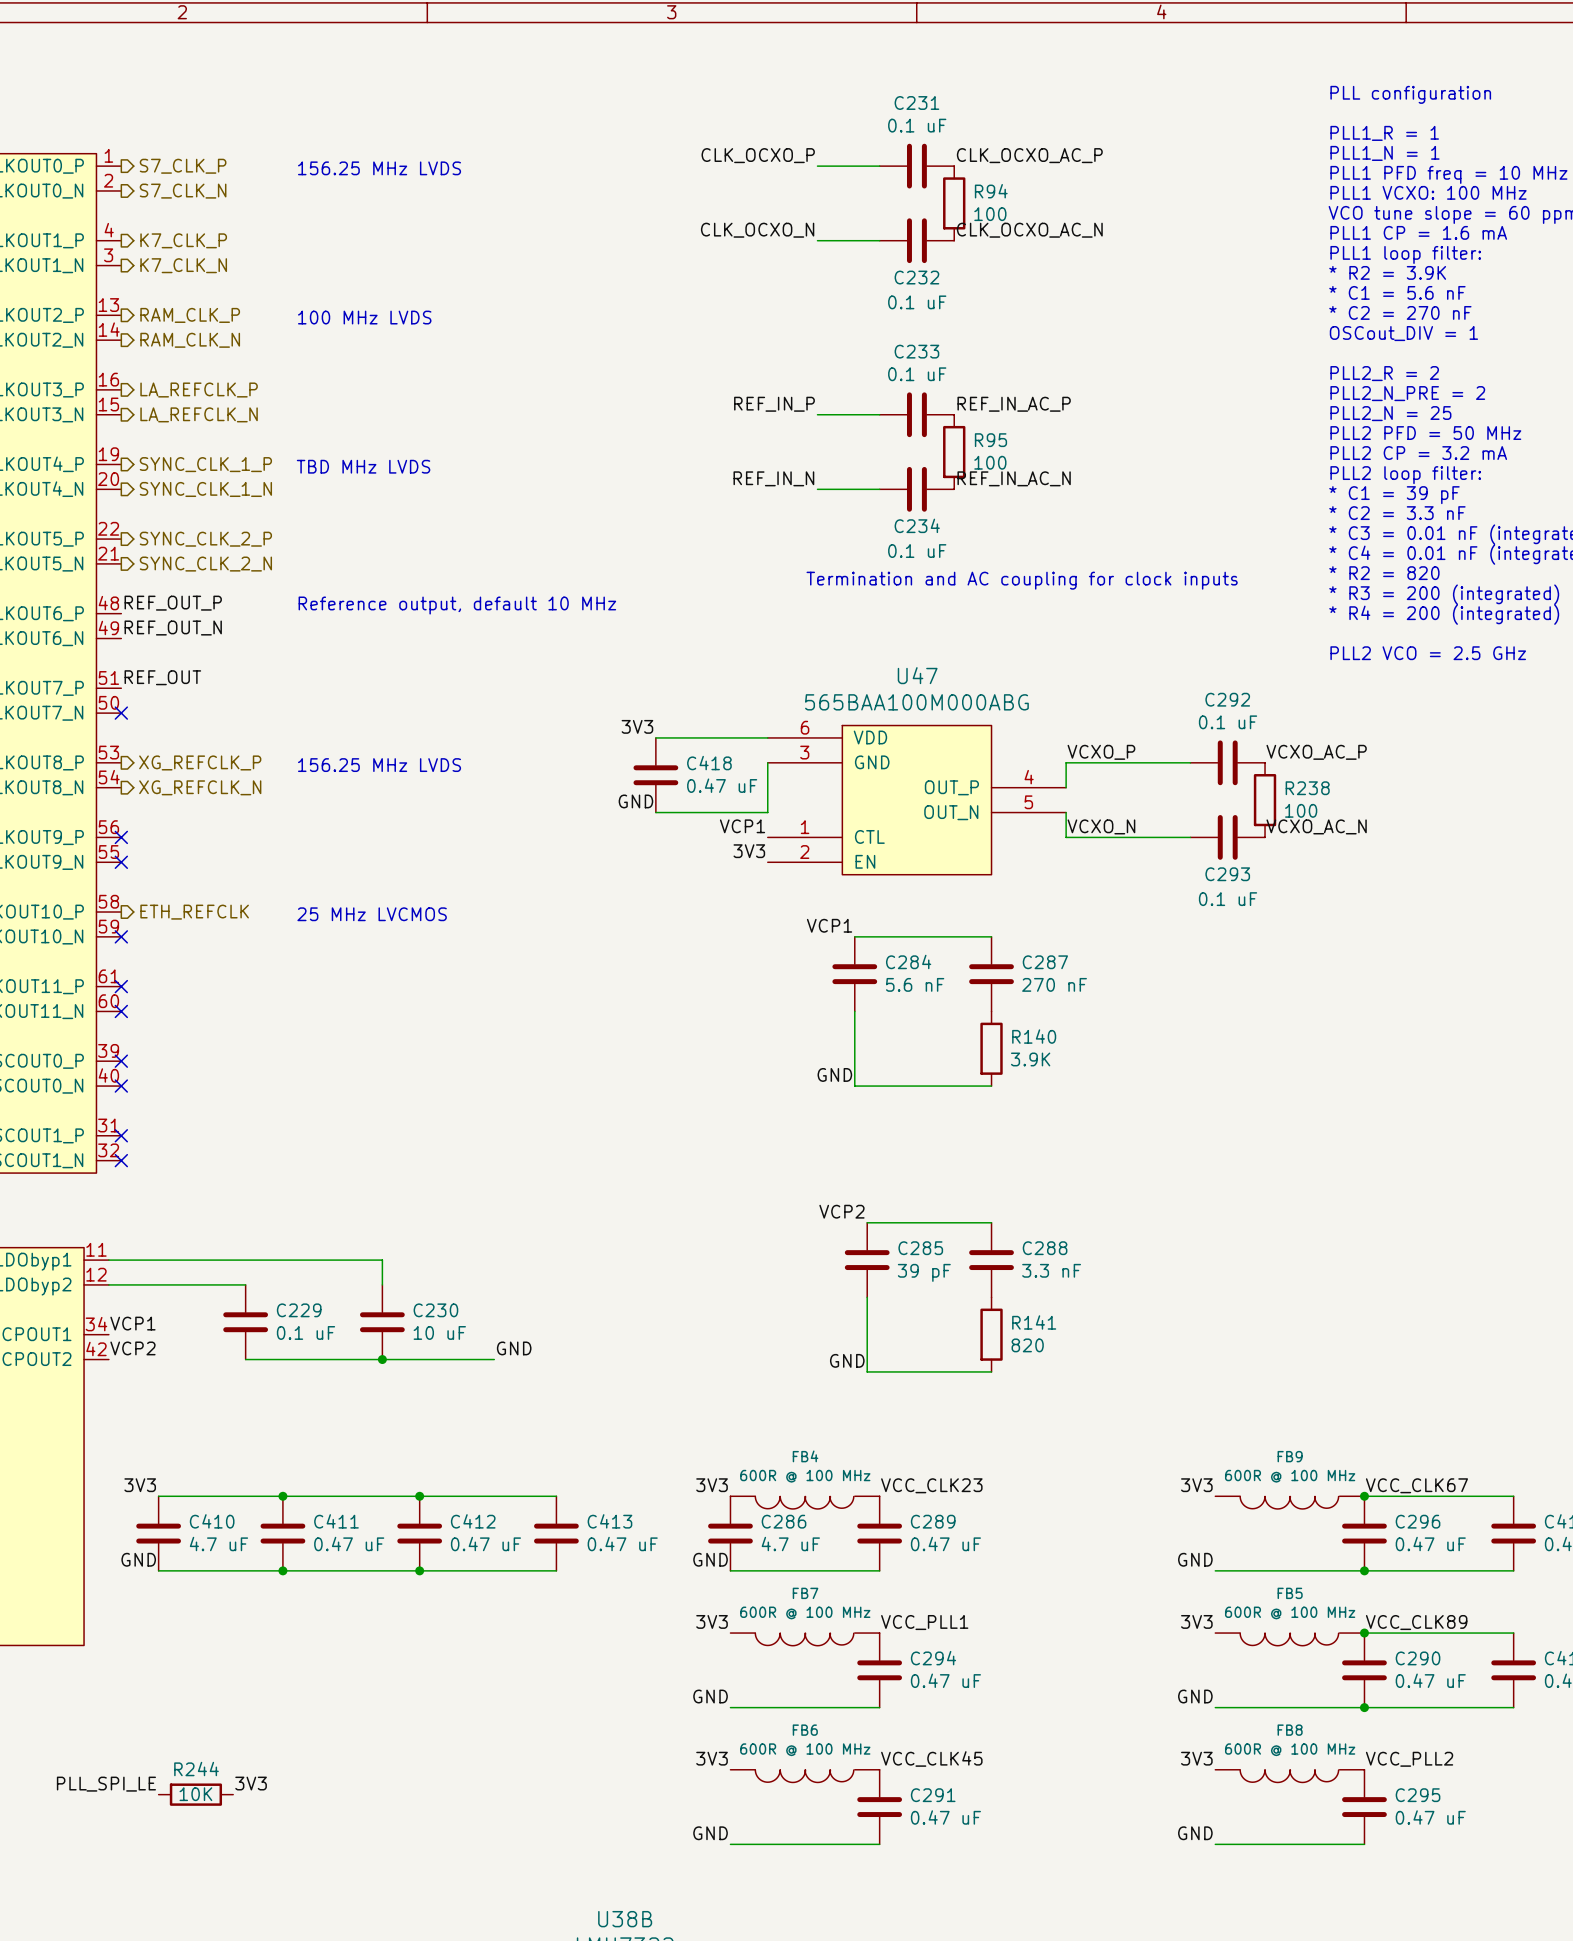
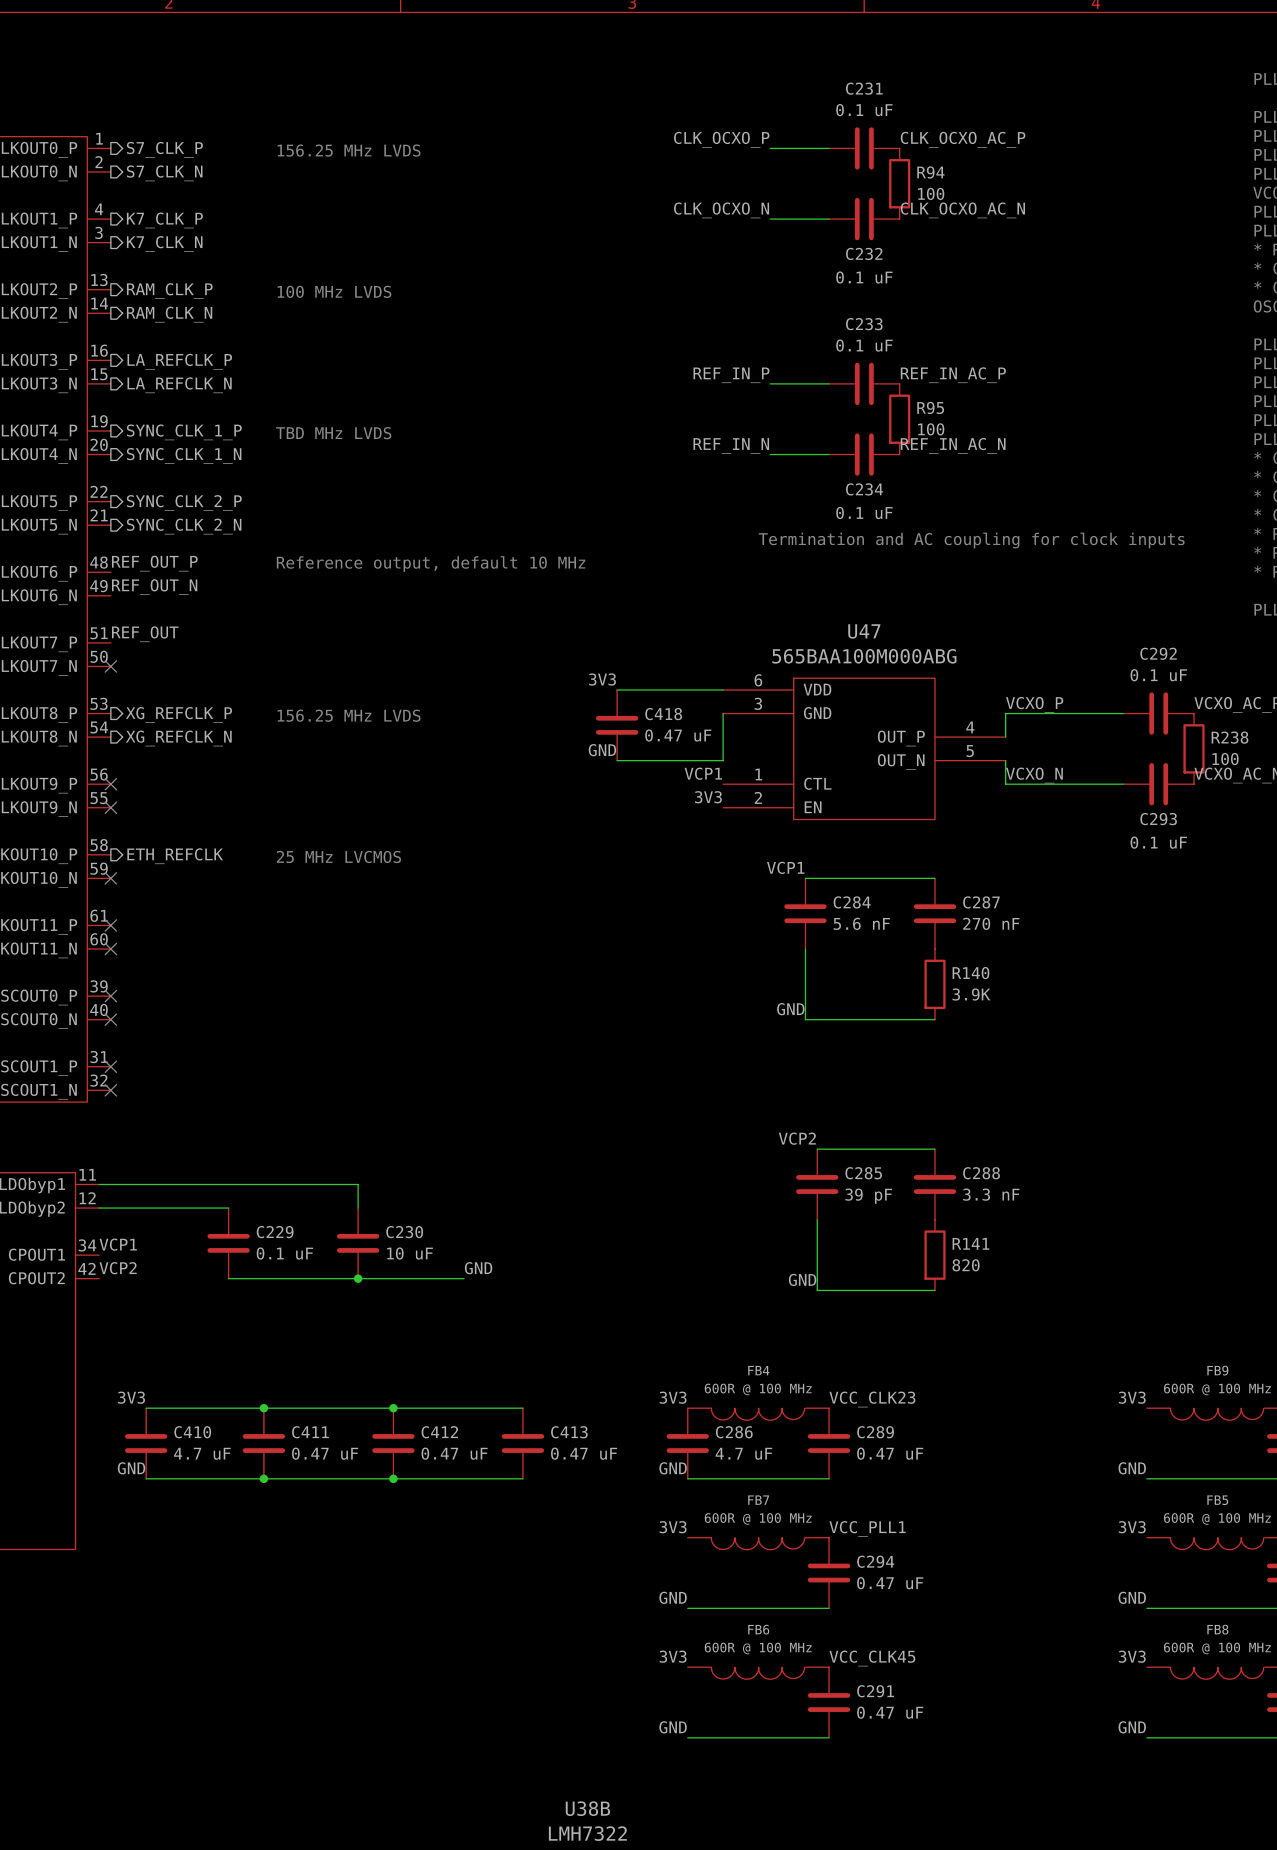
label: 3V3 (251, 1783) -> none
label: PLL_SPI_LE (106, 1784) -> none
R244: 10K (195, 1794) -> none

